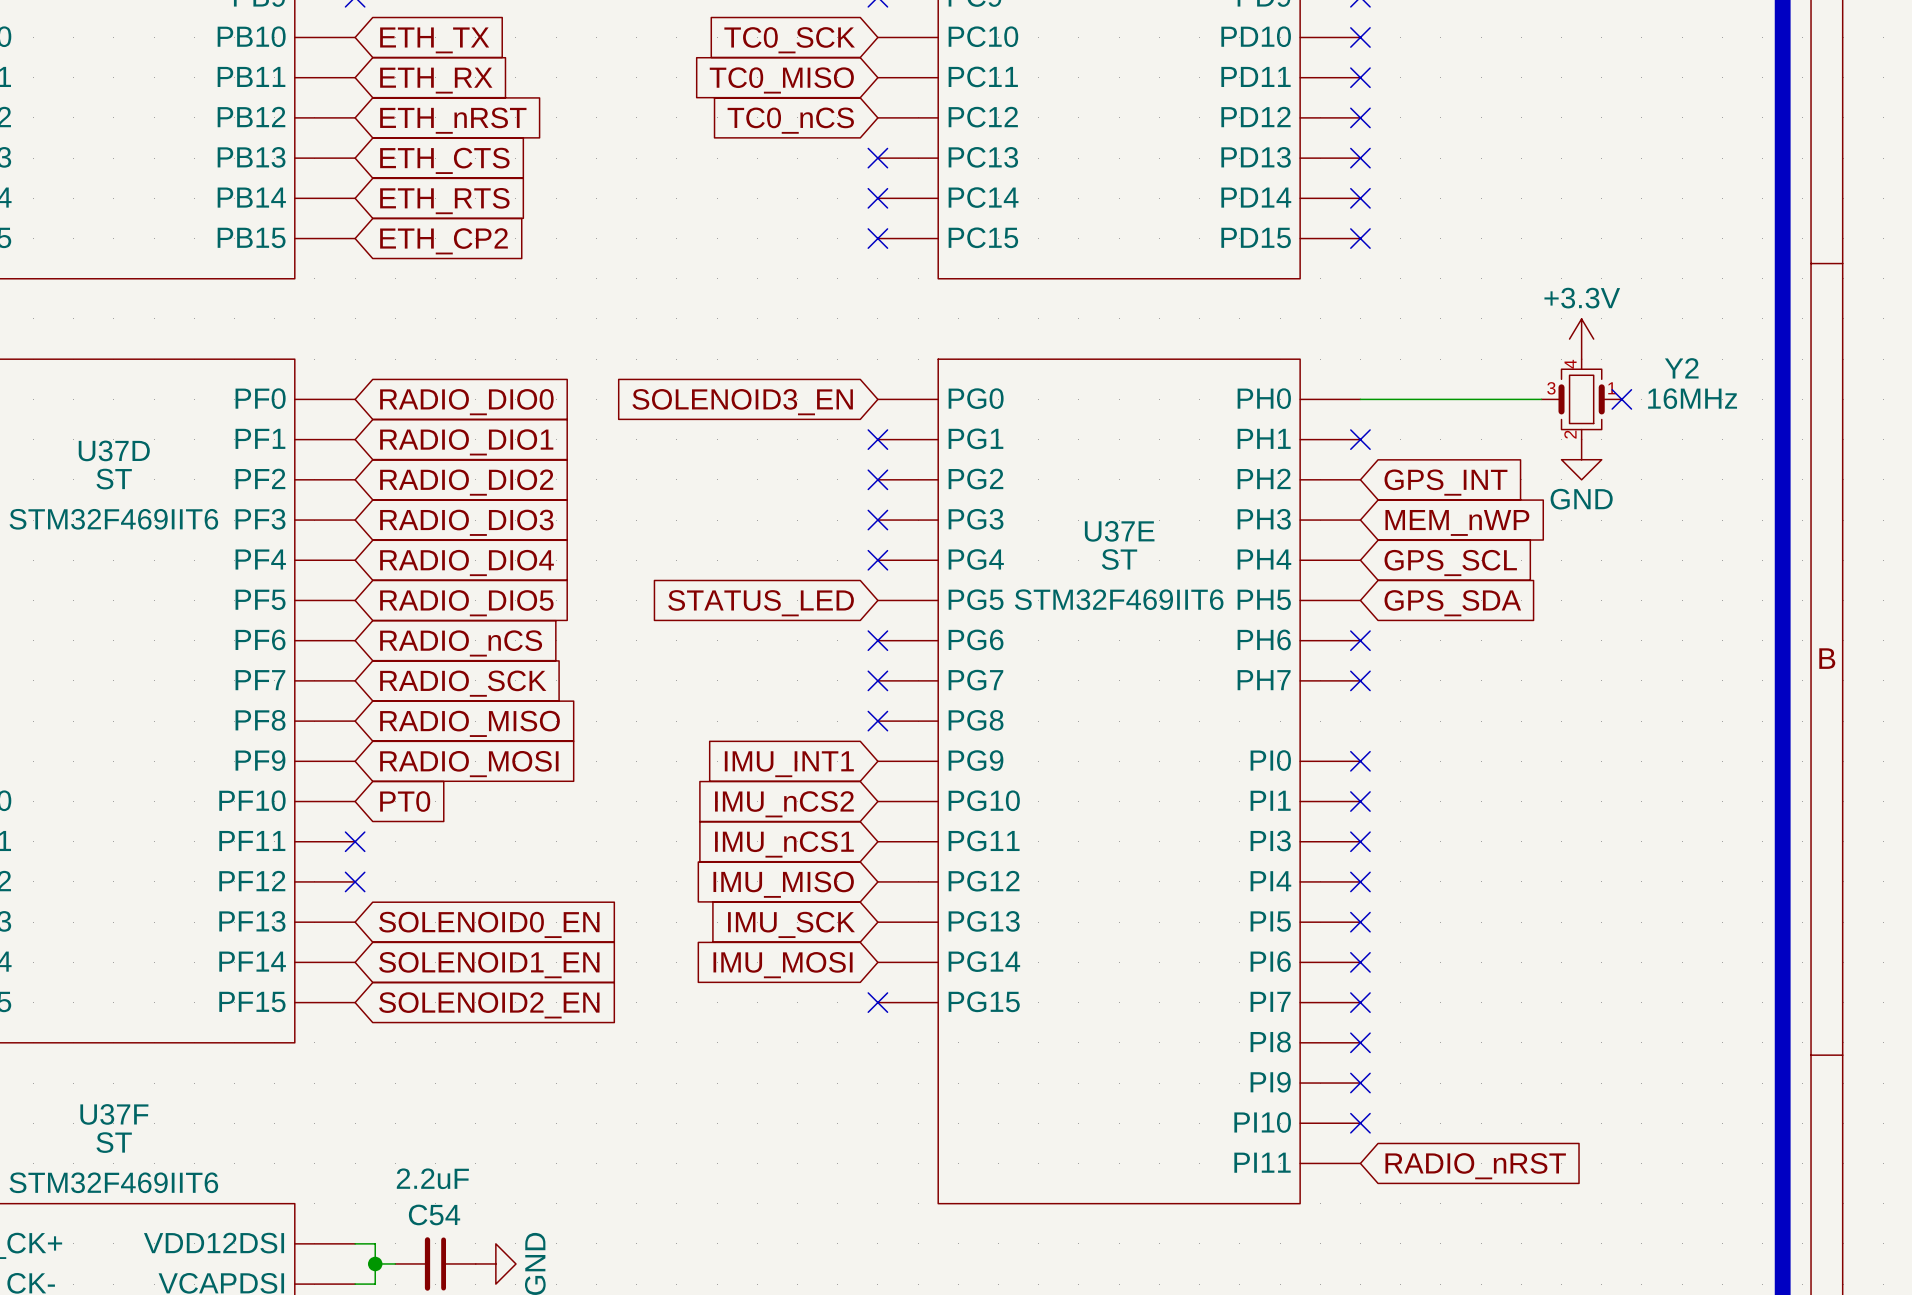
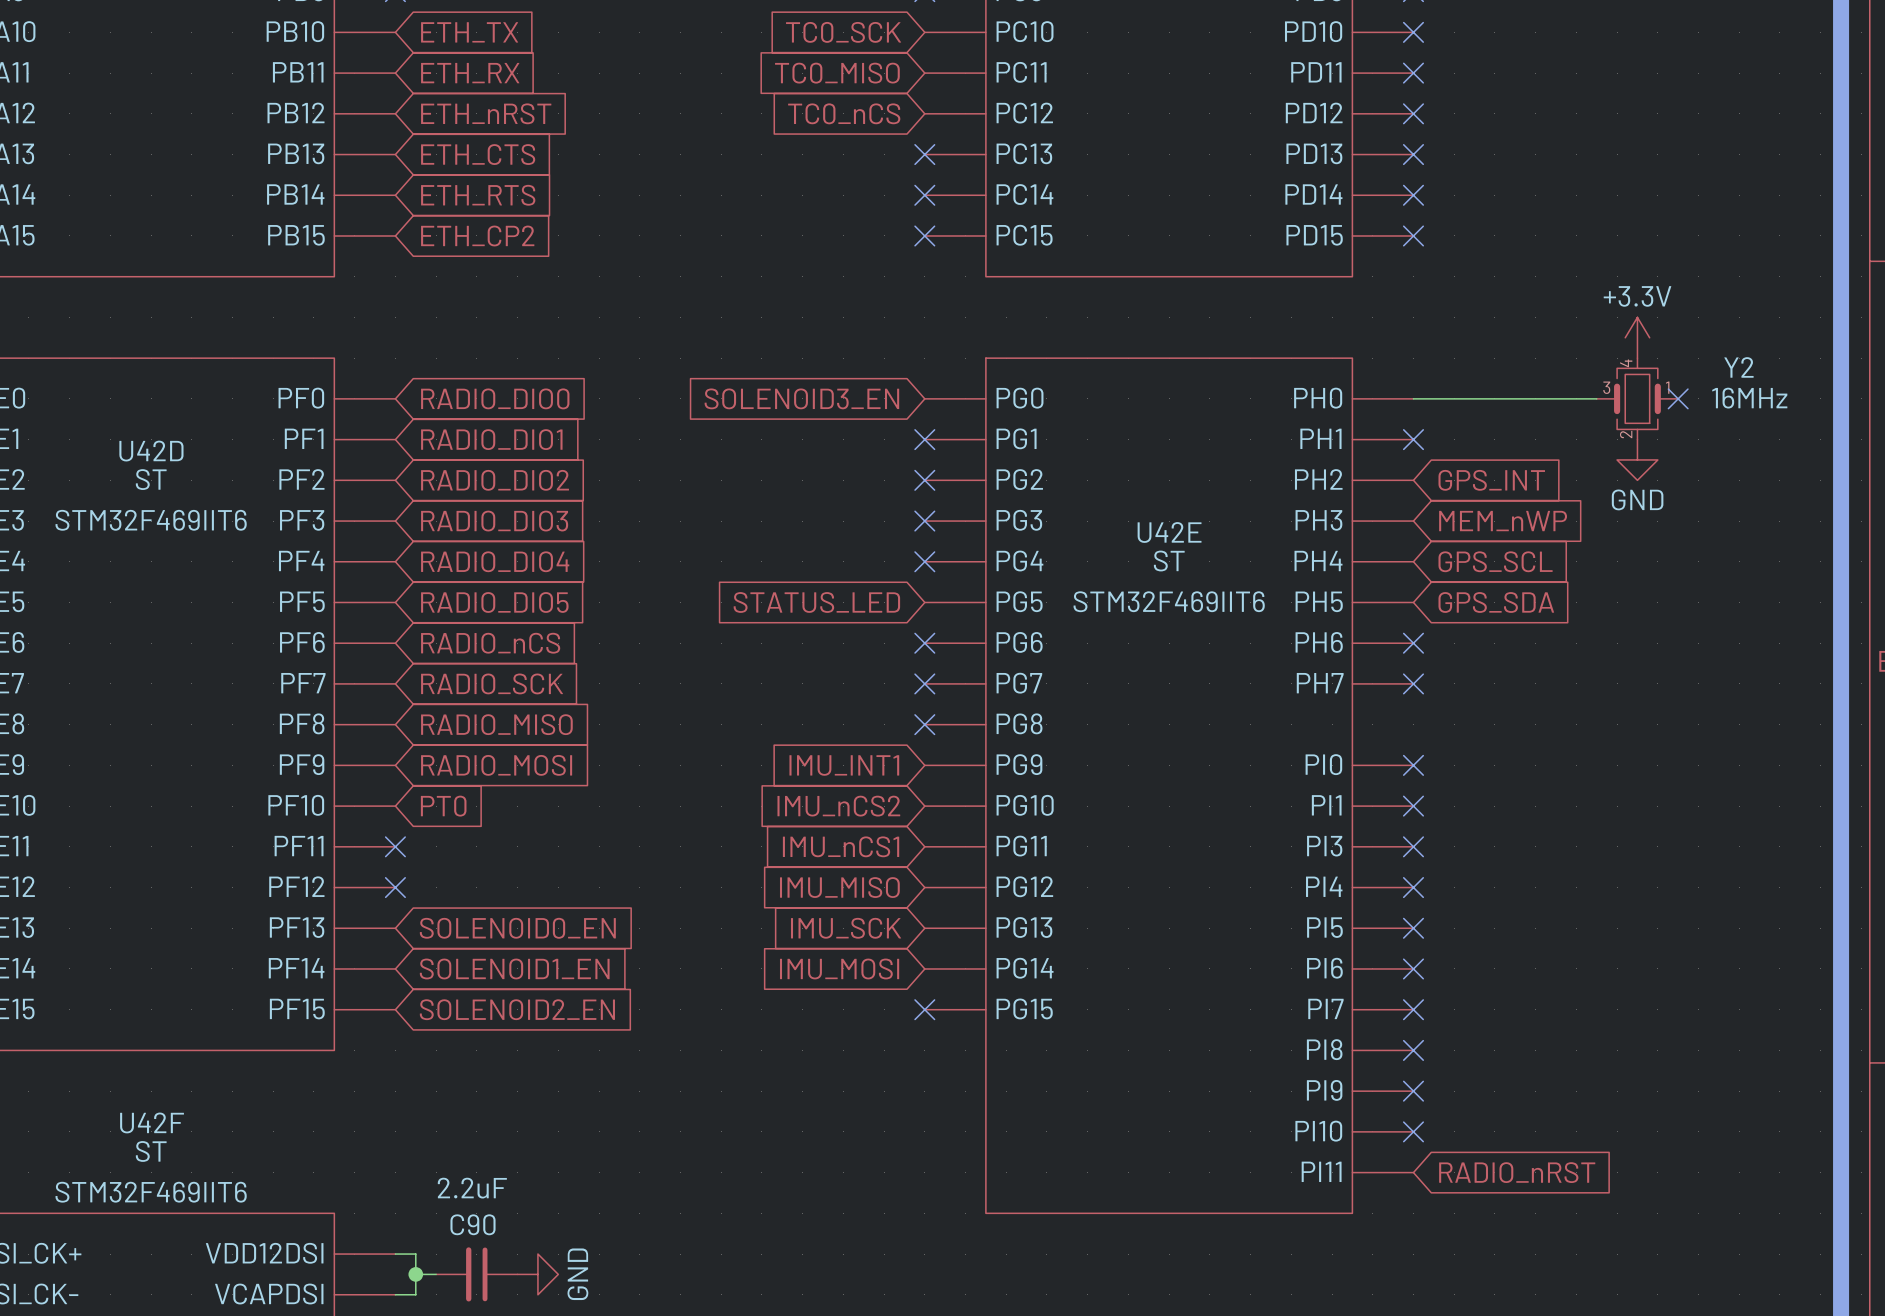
U37D name: U37D (114, 450) -> U42D (151, 451)
U37E name: U37E (1119, 531) -> U42E (1169, 532)
U37F name: U37F (114, 1114) -> U42F (152, 1122)
C54 name: C54 (434, 1214) -> C90 (473, 1224)

